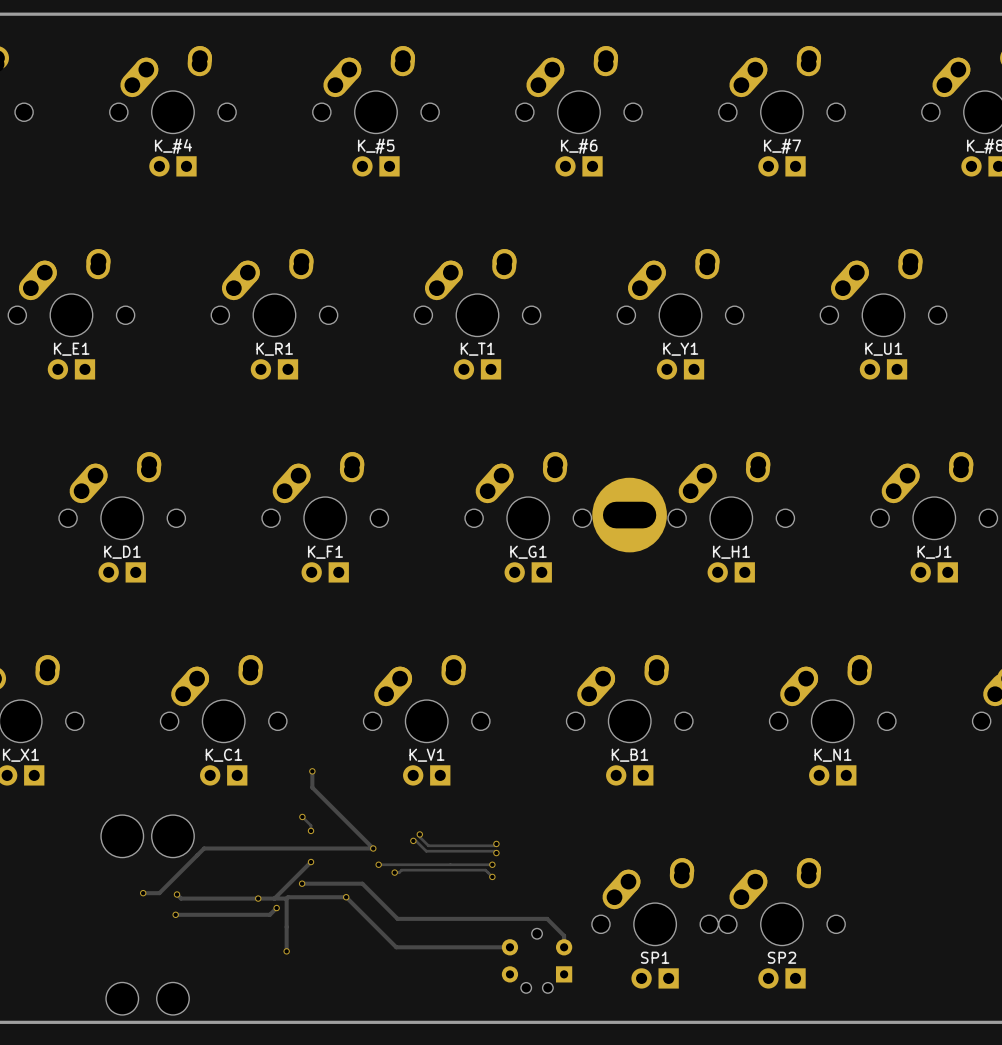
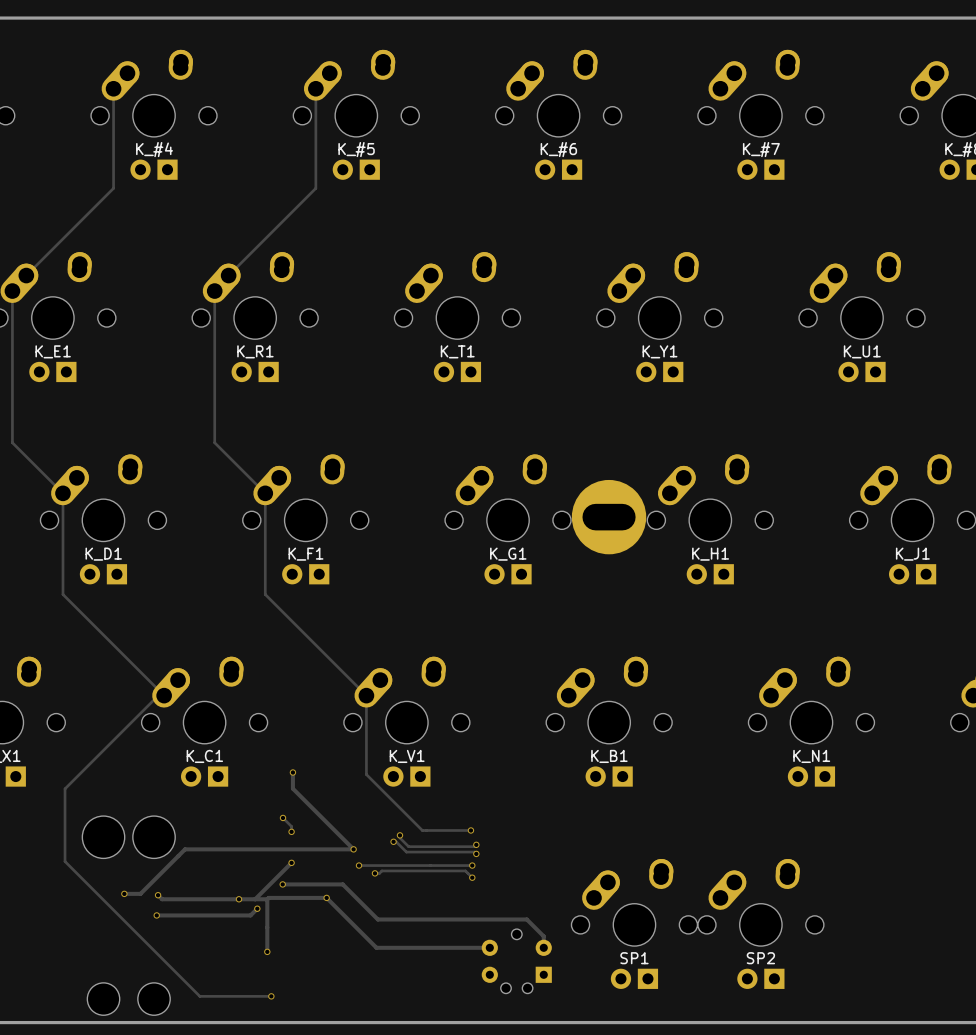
track: none -> (113, 88) (113, 188) (26, 275)
track: none -> (315, 88) (315, 188) (228, 275)
track: none -> (12, 291) (12, 442) (63, 493) (63, 594) (164, 695) (158, 695) (65, 788) (65, 861) (199, 996) (271, 996)
track: none -> (214, 291) (214, 442) (265, 493) (265, 594) (366, 695) (366, 774) (422, 830) (470, 830)
via: none -> (470, 830)
via: none -> (271, 996)

